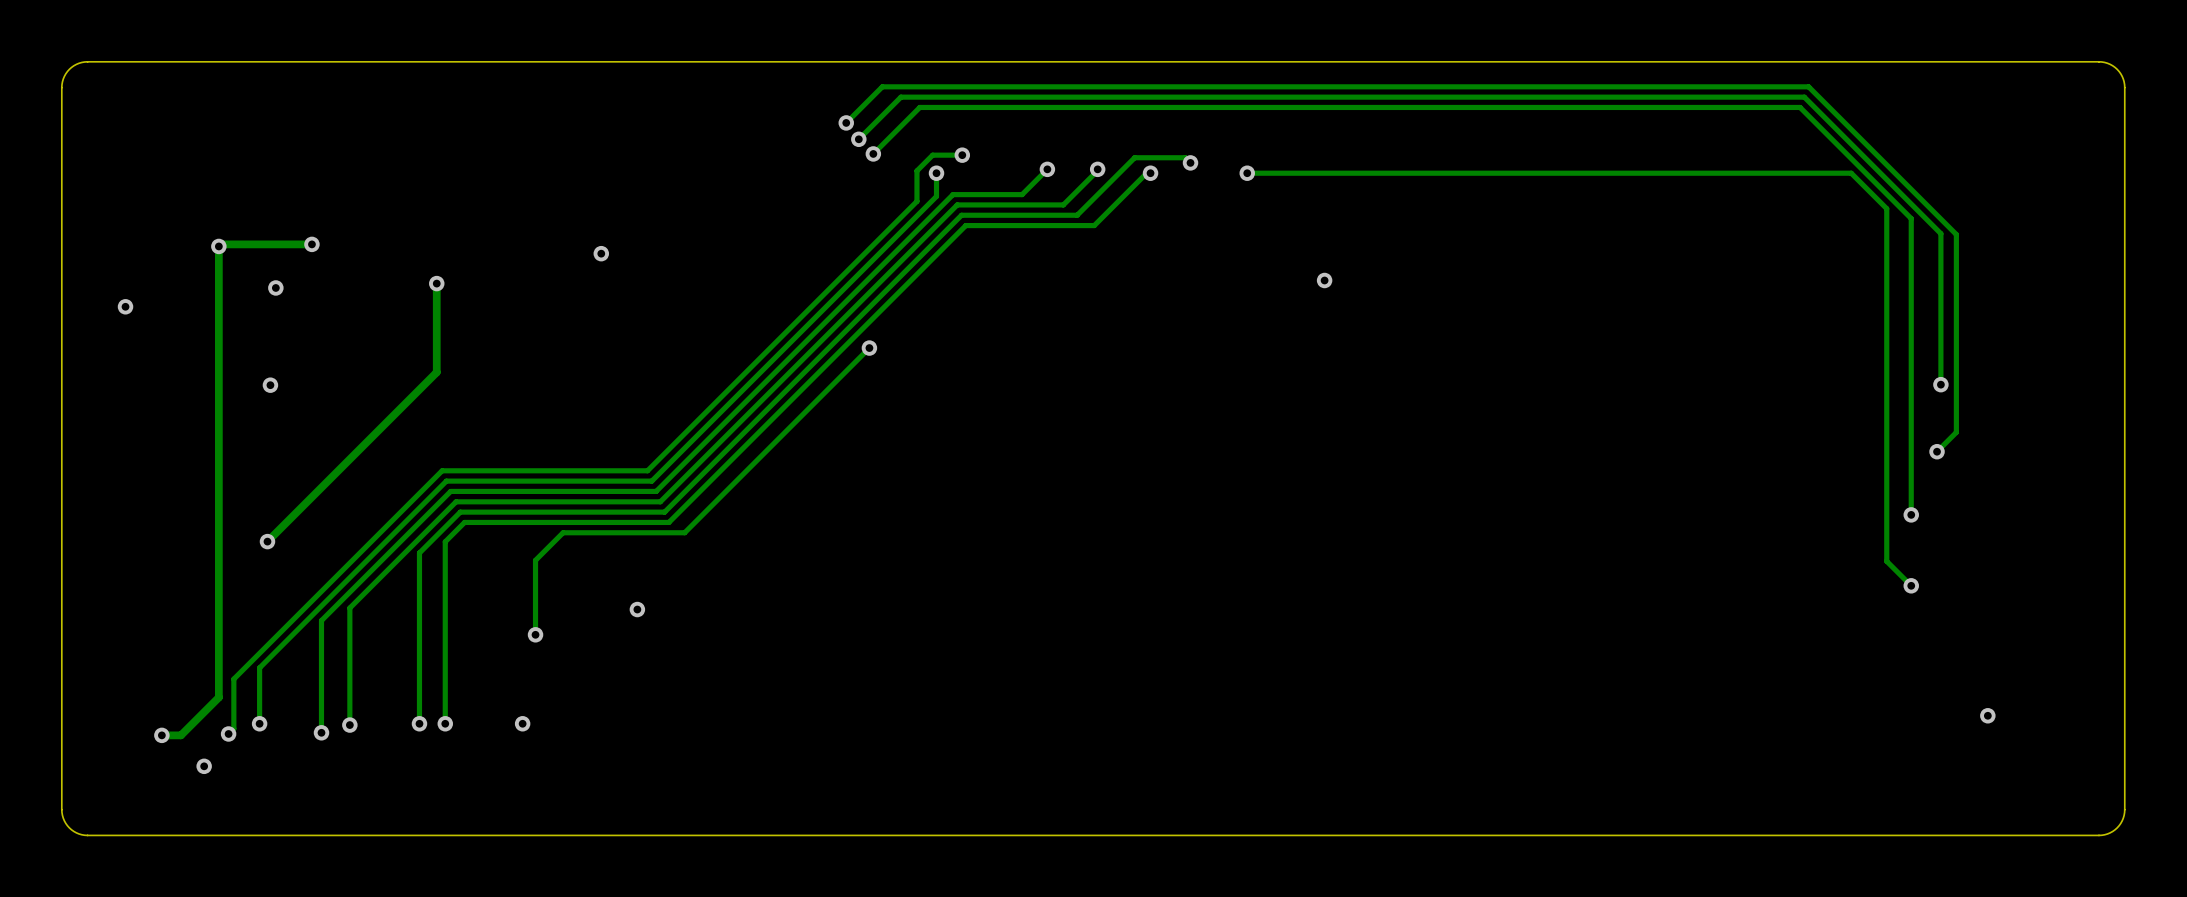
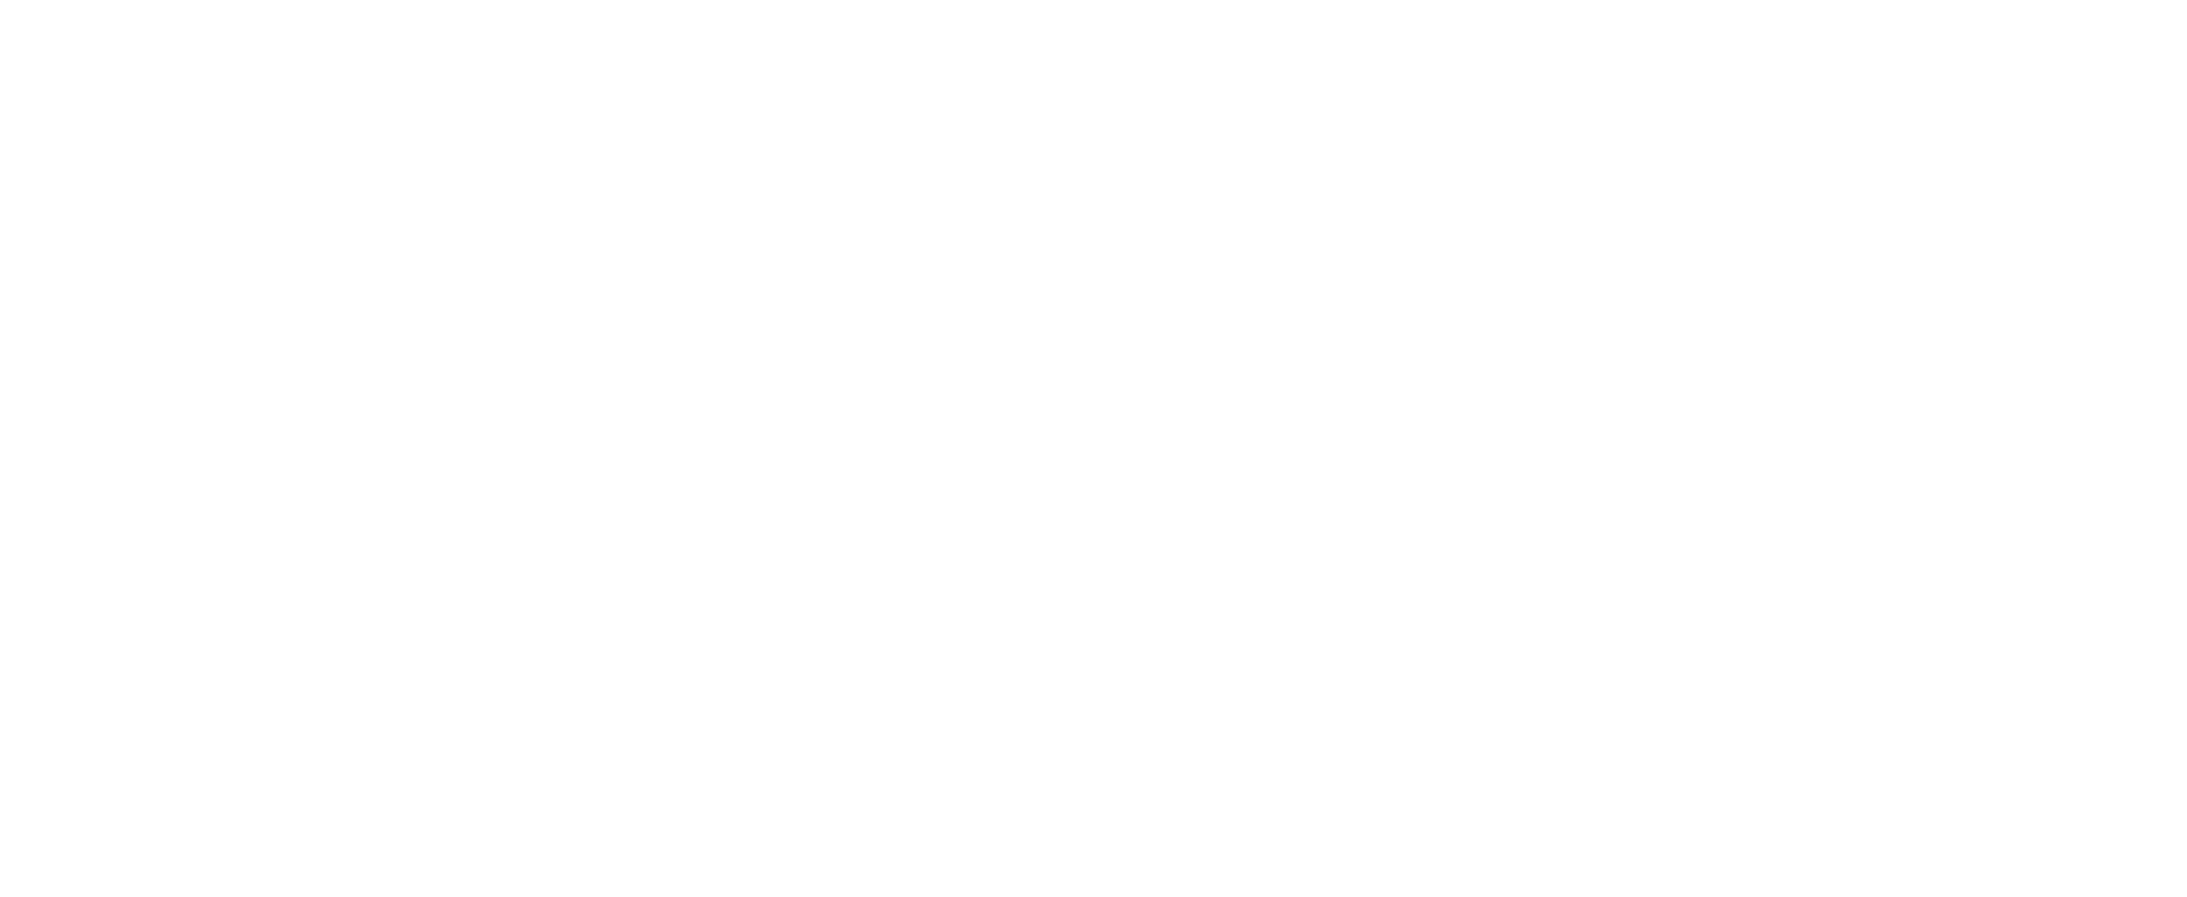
board edge: (2098, 61) (79, 63) (67, 71) (61, 87) (63, 818) (73, 831) (87, 835) (2107, 833) (2119, 825) (2124, 809) (2124, 87) (2123, 79) (2117, 69) (2110, 64) (2098, 61) -> none
track: (846, 122) (882, 86) (1808, 86) (1956, 234) (1956, 432) (1937, 451) -> none
via: (846, 122) -> none
track: (858, 139) (900, 97) (1804, 97) (1940, 233) (1940, 384) -> none
via: (858, 139) -> none
track: (873, 153) (919, 107) (1800, 107) (1911, 218) (1911, 514) -> none
via: (873, 153) -> none
track: (962, 155) (932, 155) (916, 170) (916, 201) (647, 470) (442, 470) (233, 679) (233, 728) (228, 733) -> none
via: (962, 155) -> none
track: (1190, 162) (1185, 157) (1134, 157) (1077, 215) (961, 215) (664, 512) (460, 512) (419, 552) (419, 723) -> none
via: (1190, 162) -> none
track: (1047, 169) (1022, 194) (953, 194) (656, 491) (450, 491) (321, 620) (321, 732) -> none
via: (1047, 169) -> none
track: (1097, 169) (1063, 204) (957, 204) (660, 501) (456, 501) (349, 608) (349, 725) -> none
via: (1097, 169) -> none
track: (936, 173) (936, 196) (651, 481) (446, 481) (259, 667) (259, 723) -> none
via: (936, 173) -> none
track: (1150, 173) (1146, 173) (1094, 225) (965, 225) (668, 522) (464, 522) (445, 541) (445, 723) -> none
via: (1150, 173) -> none
track: (1247, 173) (1851, 173) (1886, 208) (1886, 561) (1911, 585) -> none
via: (1247, 173) -> none
track: (311, 244) (220, 244) (218, 246) (218, 697) (180, 735) (161, 735) -> none
via: (311, 244) -> none
via: (218, 246) -> none
via: (601, 253) -> none
via: (1324, 280) -> none
track: (436, 283) (436, 372) (267, 541) -> none
via: (436, 283) -> none
via: (275, 287) -> none
via: (125, 306) -> none
track: (869, 348) (684, 532) (563, 532) (535, 560) (535, 634) -> none
via: (869, 348) -> none
via: (1940, 384) -> none
via: (270, 385) -> none
via: (1937, 451) -> none
via: (1911, 514) -> none
via: (267, 541) -> none
via: (1911, 585) -> none
via: (637, 609) -> none
via: (535, 634) -> none
via: (1987, 715) -> none
via: (259, 723) -> none
via: (419, 723) -> none
via: (445, 723) -> none
via: (522, 723) -> none
via: (349, 725) -> none
via: (321, 732) -> none
via: (228, 733) -> none
via: (161, 735) -> none
via: (204, 766) -> none

